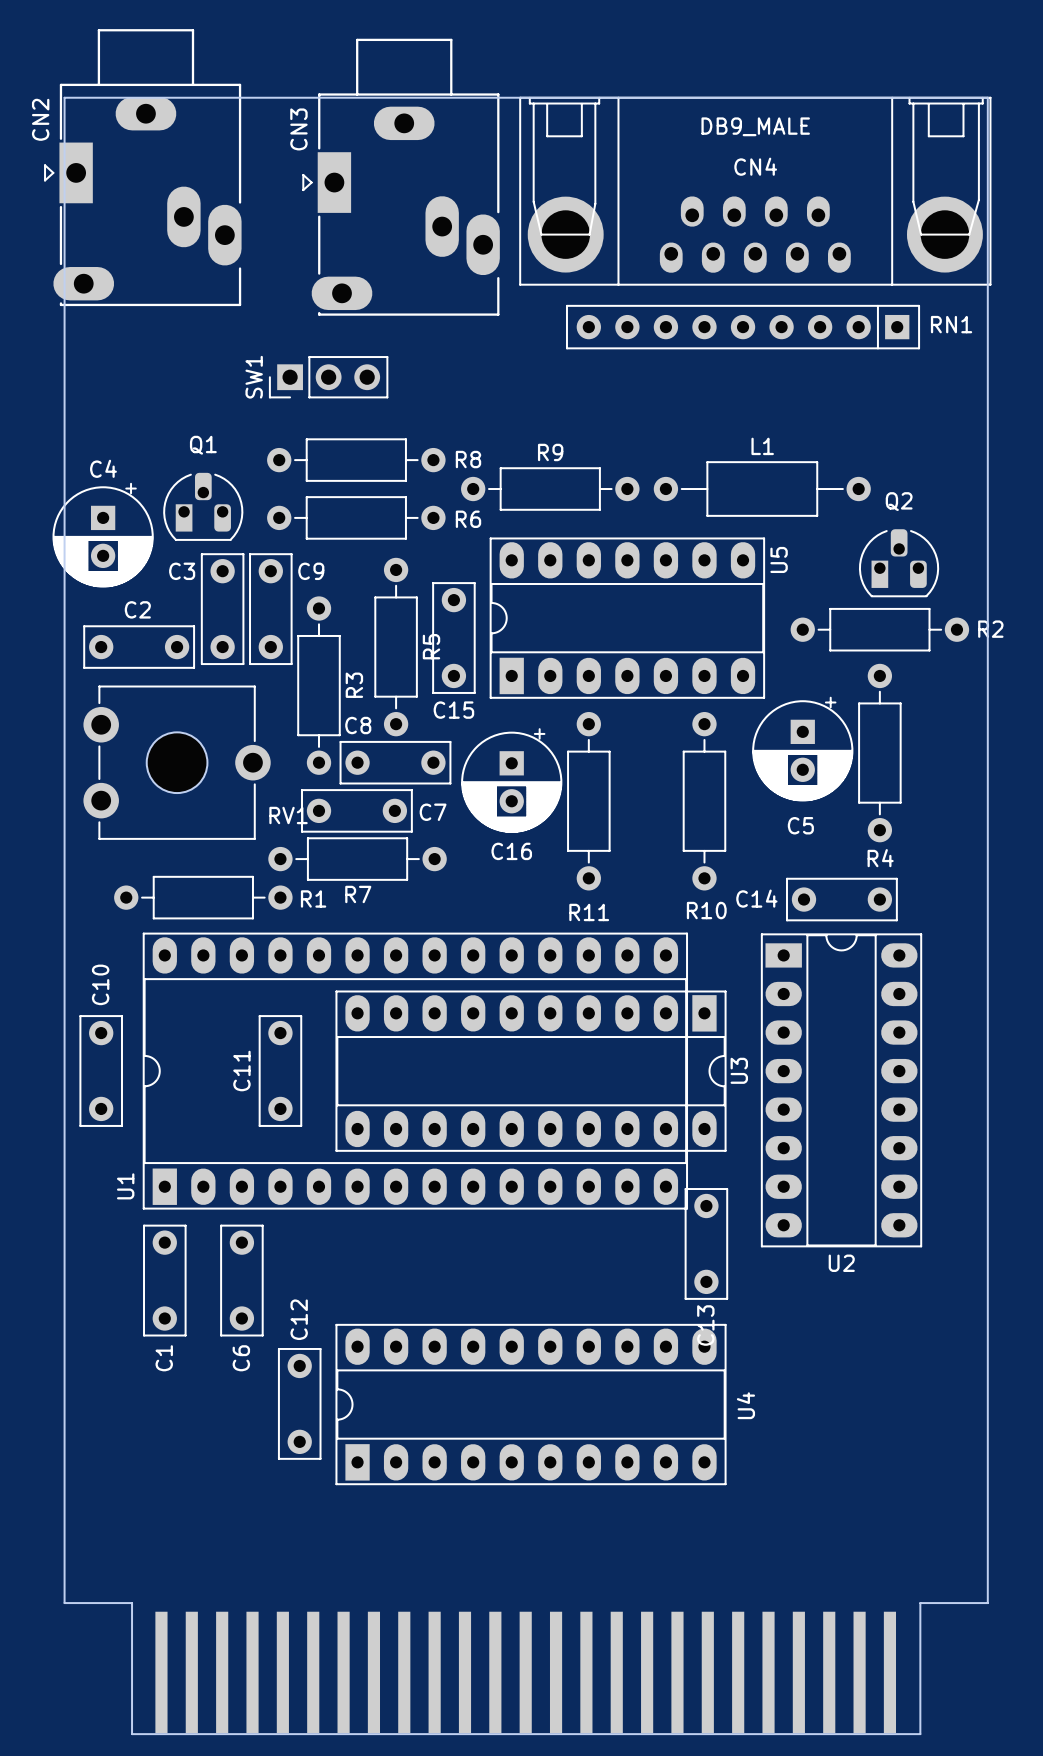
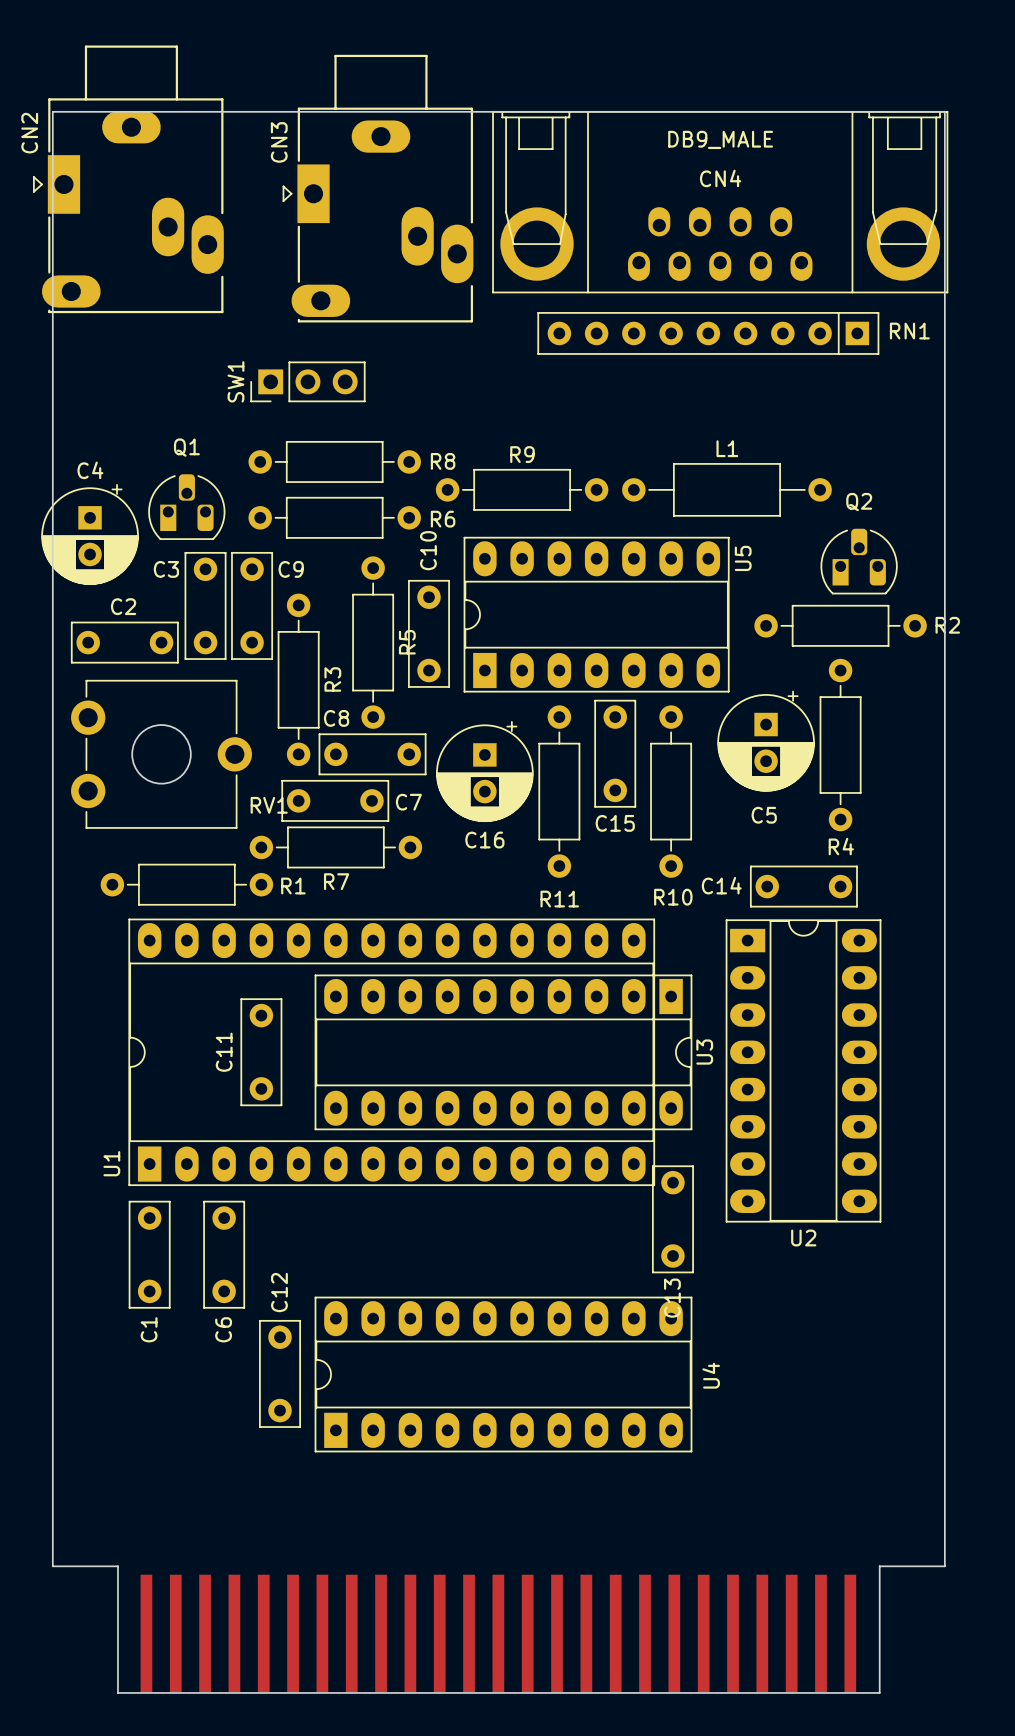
C15 name: C15 (453, 710) -> C10 (428, 550)
C15: none -> (615, 753)
C10: (101, 1071) -> none

